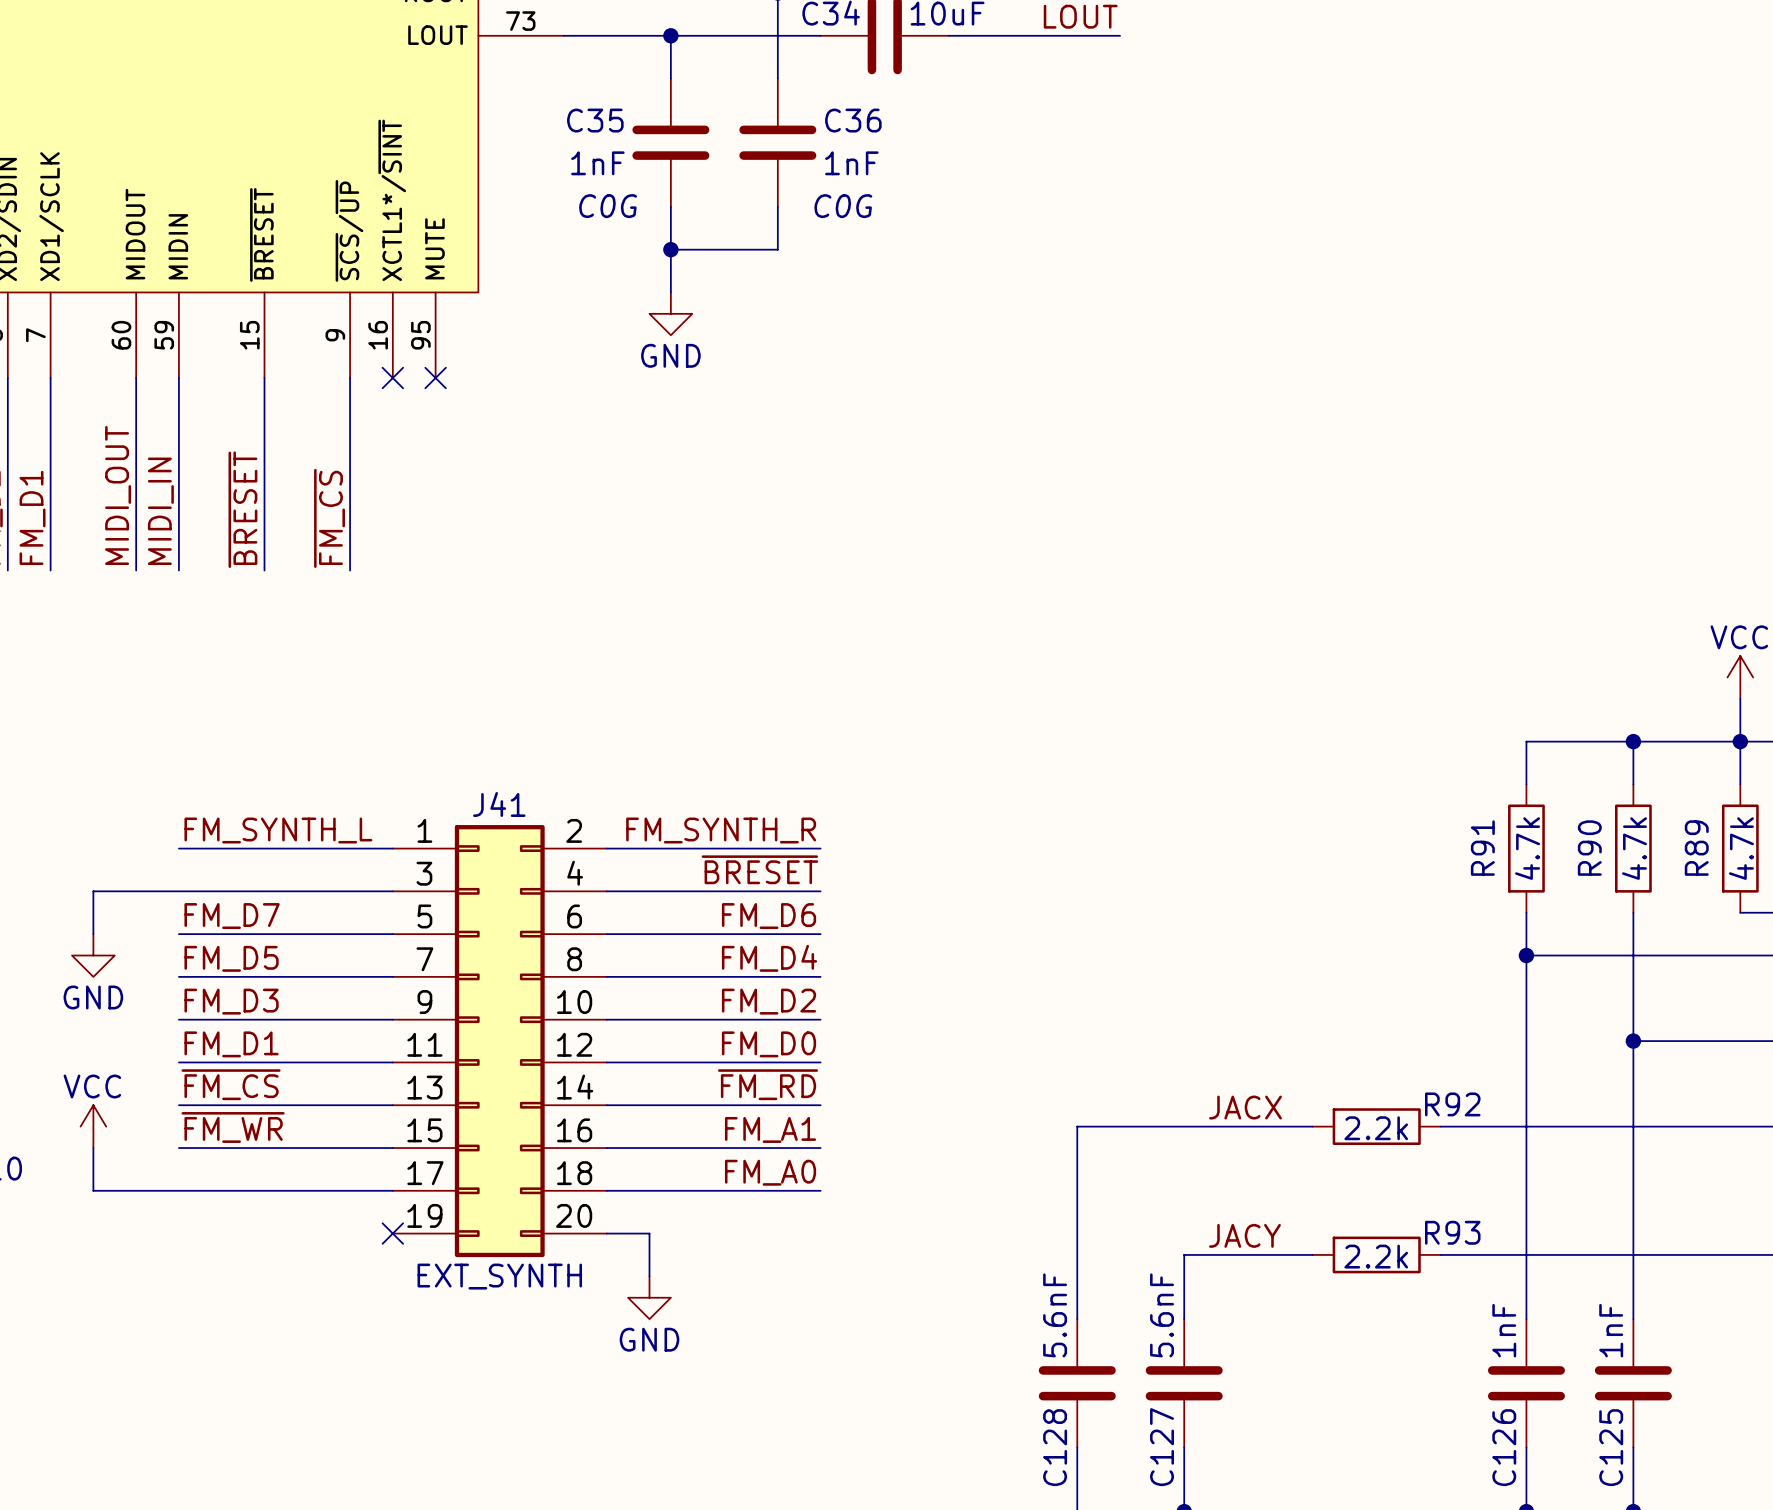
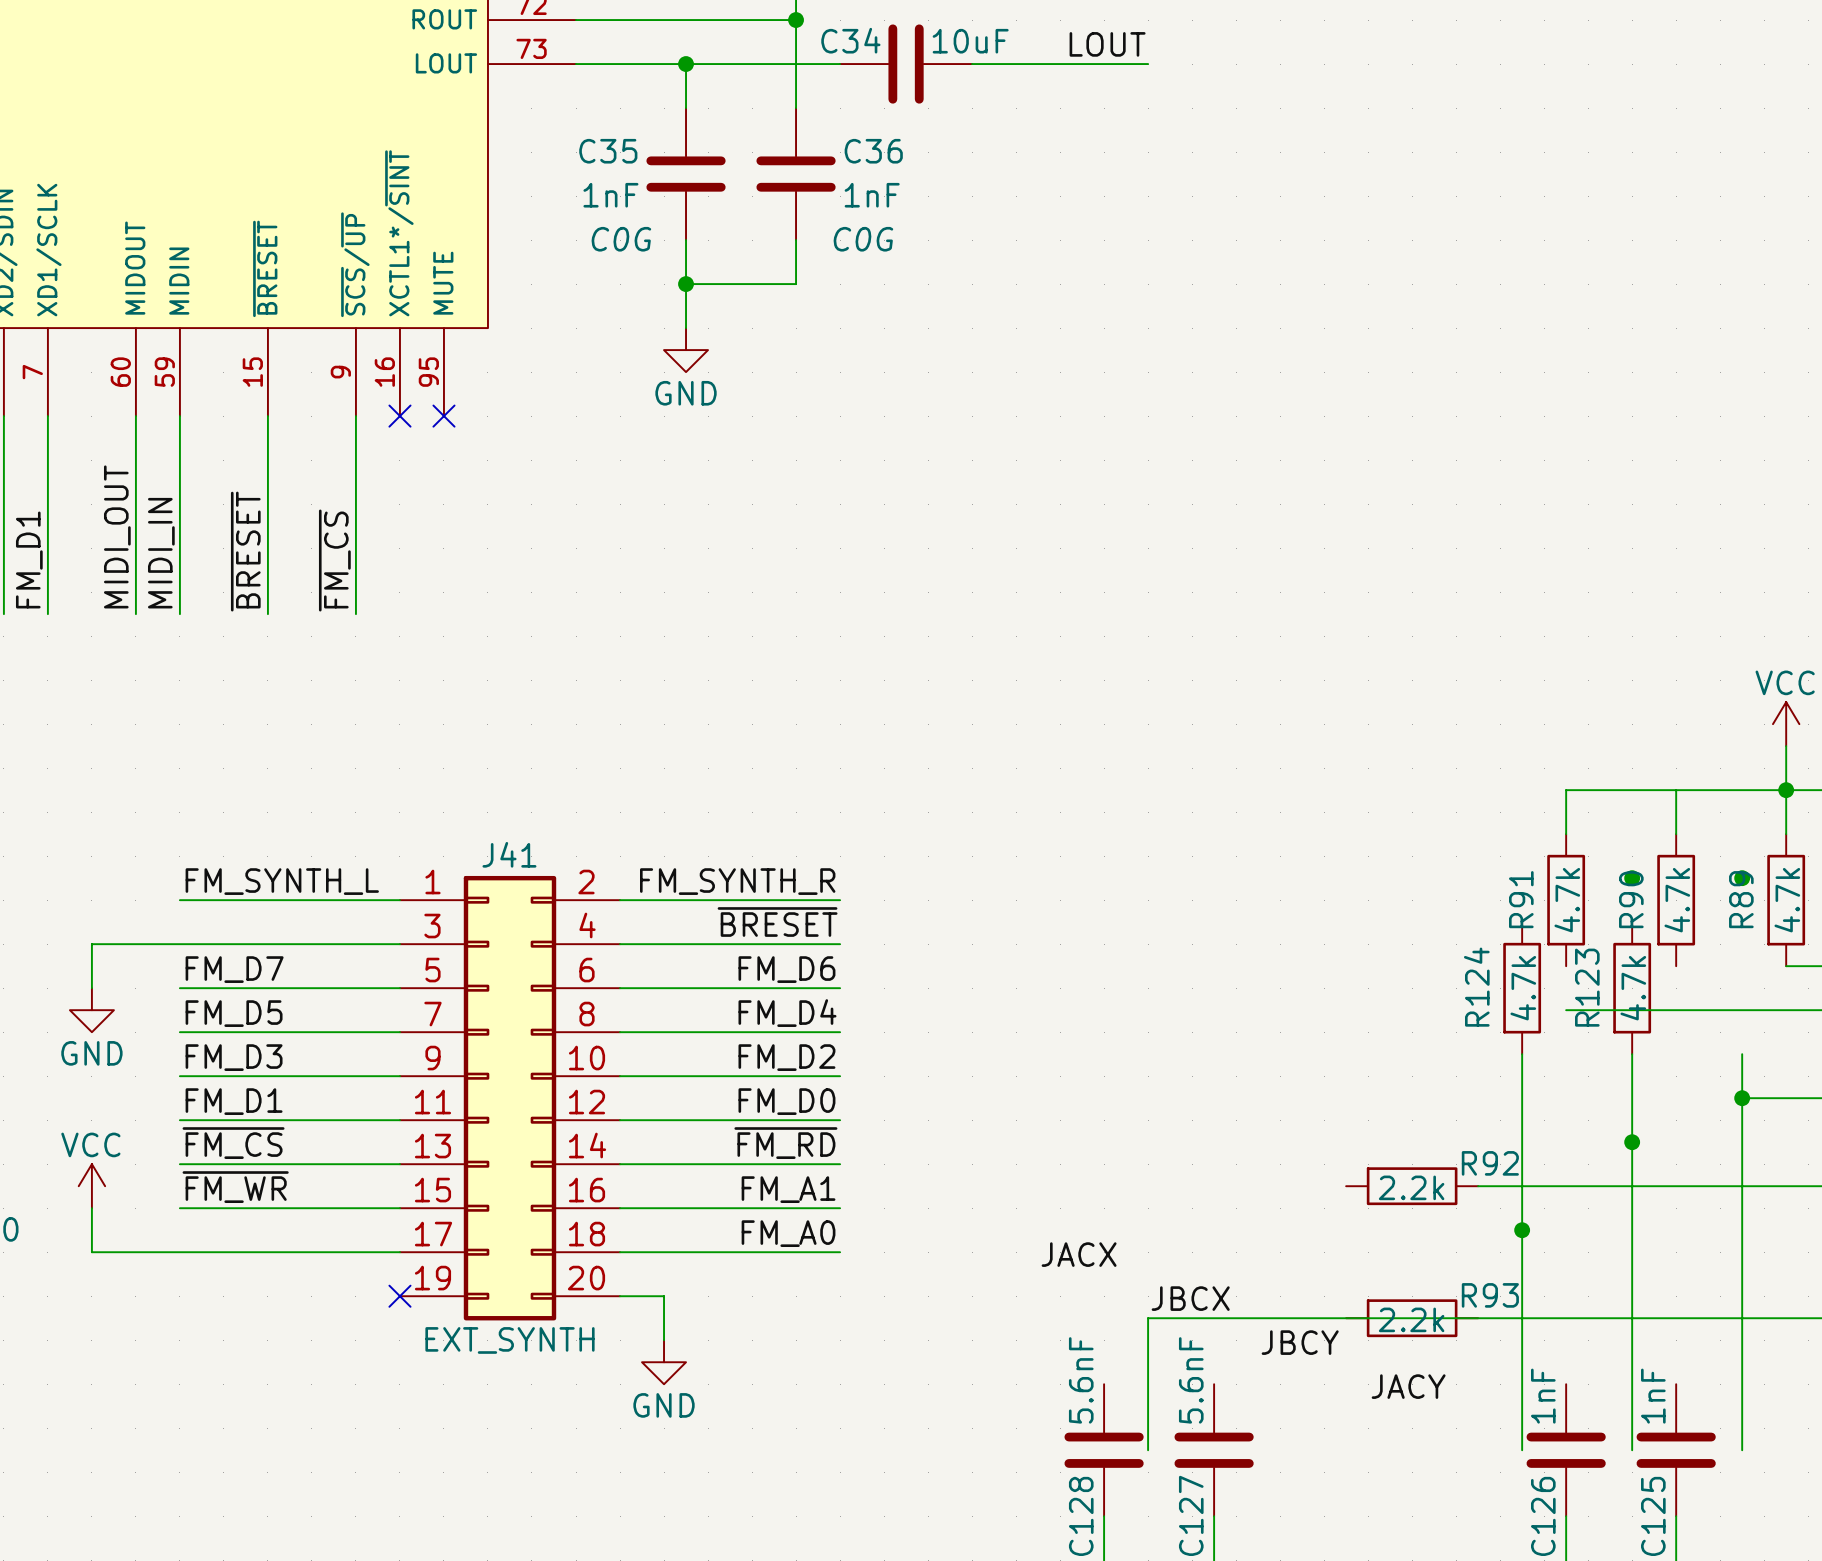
junction: (1633, 741) -> none
junction: none -> (1632, 878)
junction: none -> (1742, 878)
wire: (1526, 912) (1526, 1319) -> none
wire: (1633, 912) (1633, 1319) -> none
R124: none -> 4.7k (1522, 988)
R123: none -> 4.7k (1632, 988)
junction: (1526, 955) -> none
wire: none -> (1522, 1054) (1522, 1450)
wire: none -> (1632, 1054) (1632, 1450)
wire: none -> (1742, 1054) (1742, 1450)
wire: (1633, 1041) (1697, 1041) -> none
junction: (1633, 1041) -> none
junction: none -> (1742, 1098)
junction: none -> (1632, 1142)
label position: JACX (1245, 1107) -> JACX (1079, 1254)
wire: (1312, 1126) (1077, 1126) (1077, 1319) -> none
junction: none -> (1522, 1230)
label: none -> JBCX (1190, 1298)
label position: JACY (1244, 1235) -> JACY (1408, 1386)
wire: (1184, 1254) (1184, 1319) -> (1214, 1318) (1148, 1318) (1148, 1450)
wire: none -> (1346, 1318) (1478, 1318)
label: none -> JBCY (1300, 1342)

